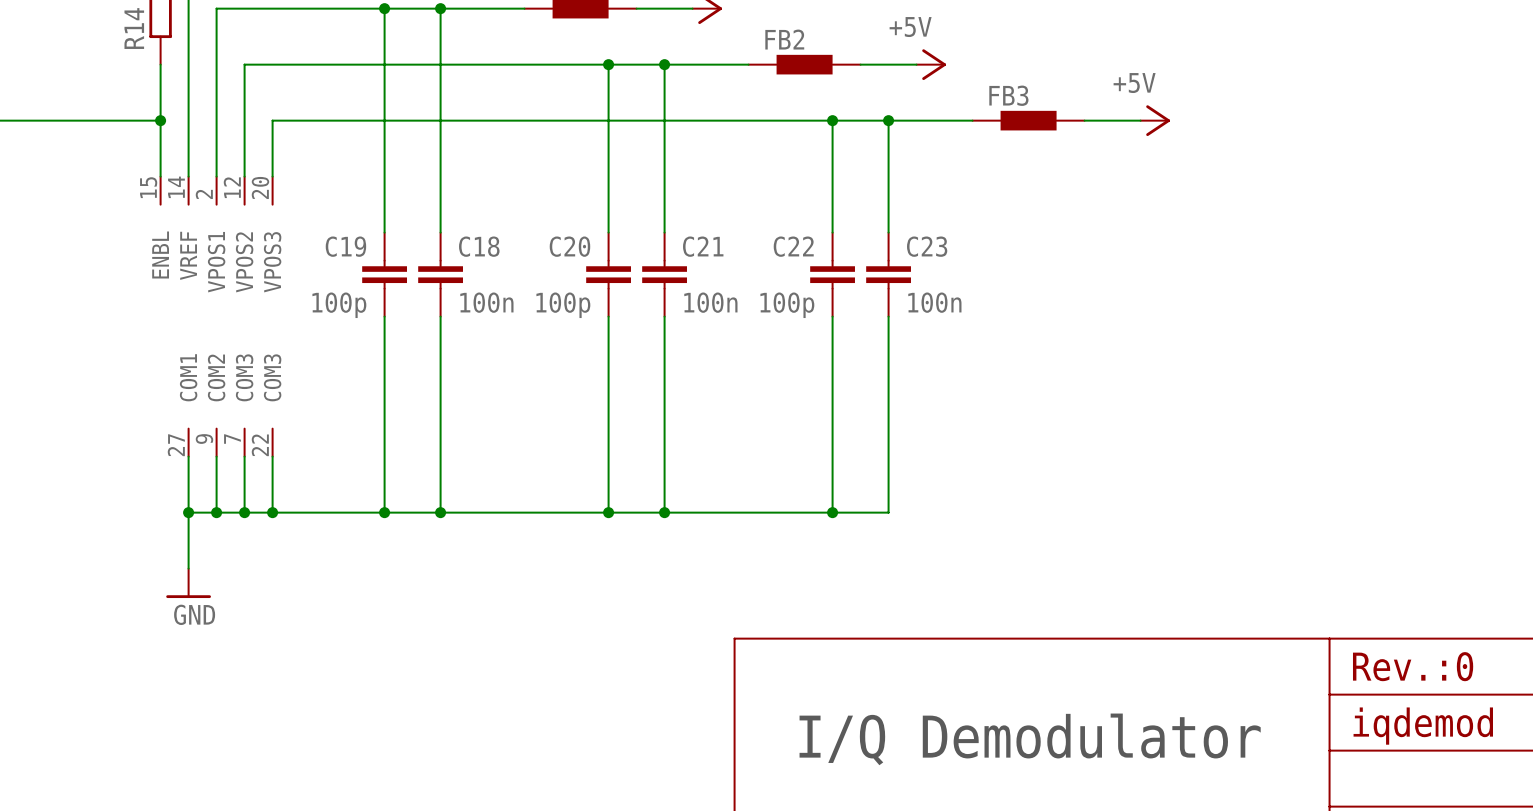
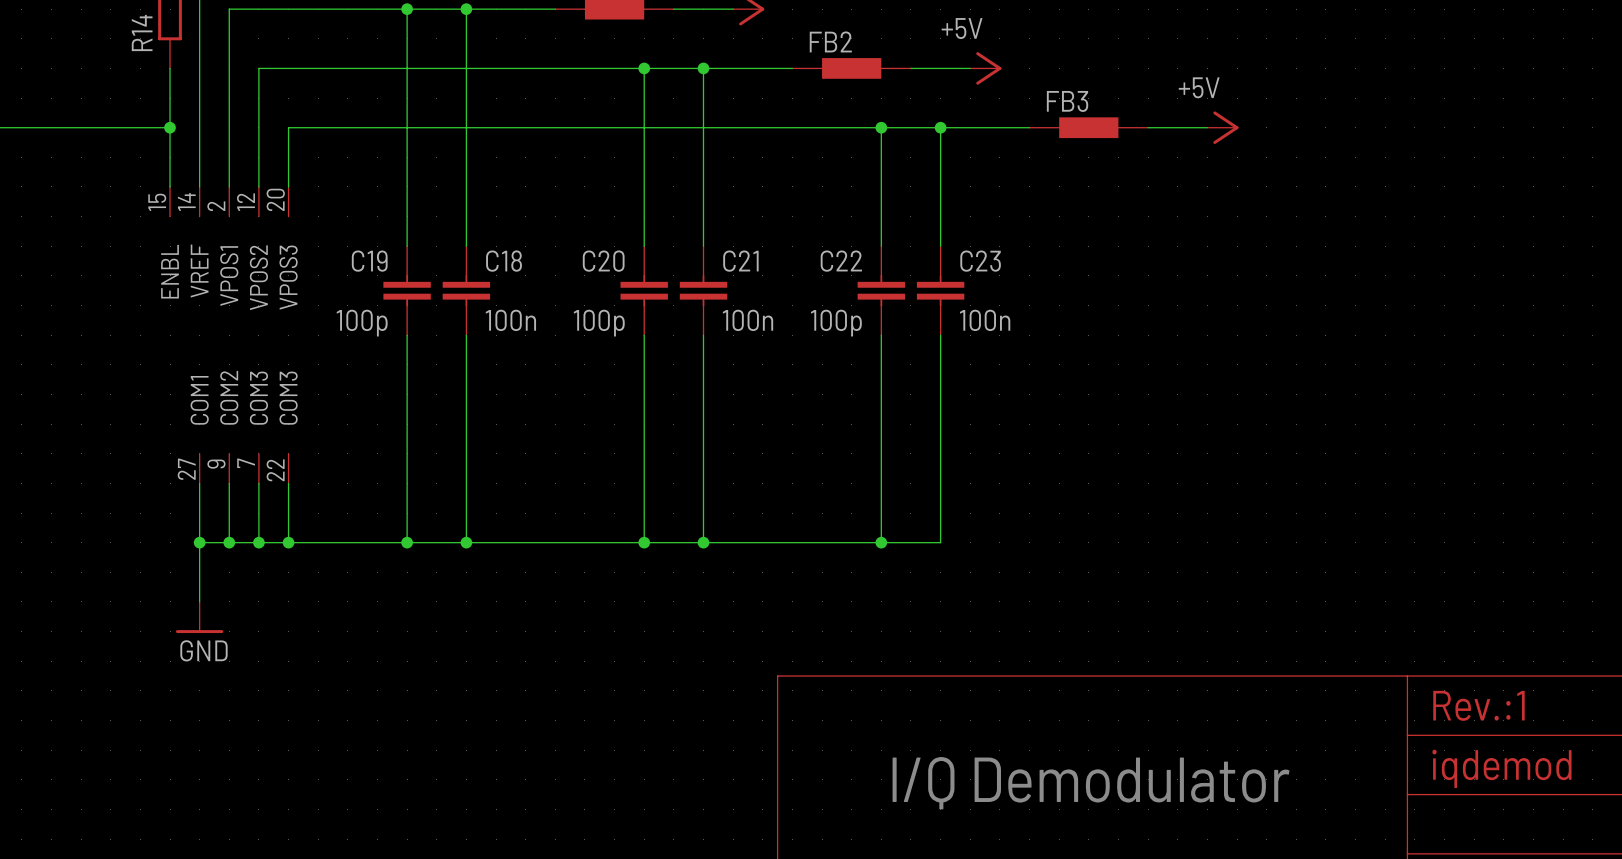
text: Rev.:0 (1413, 666) -> Rev.:1 (1478, 705)

